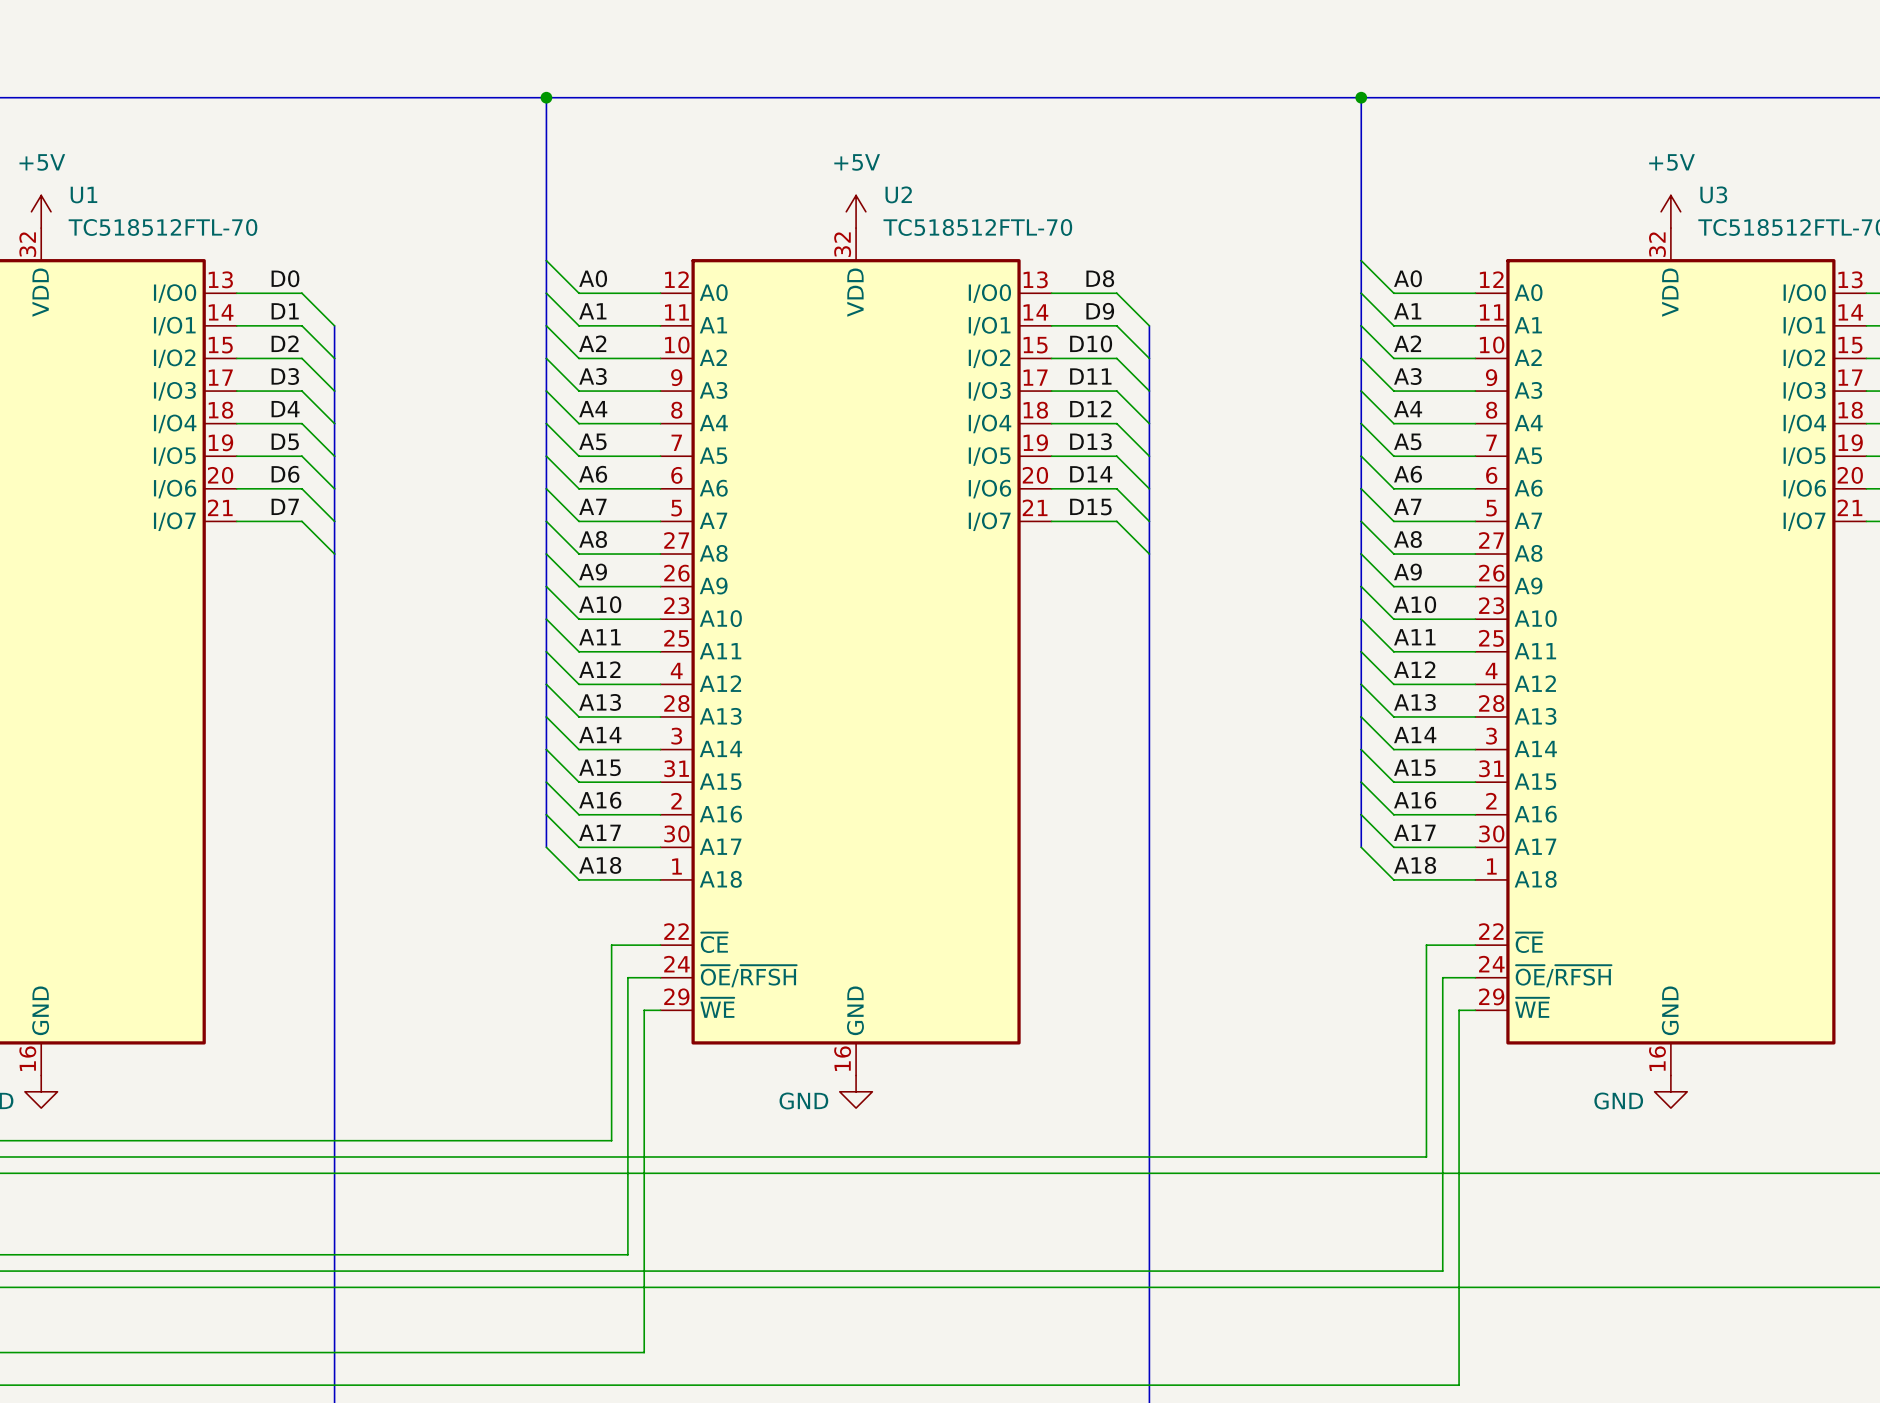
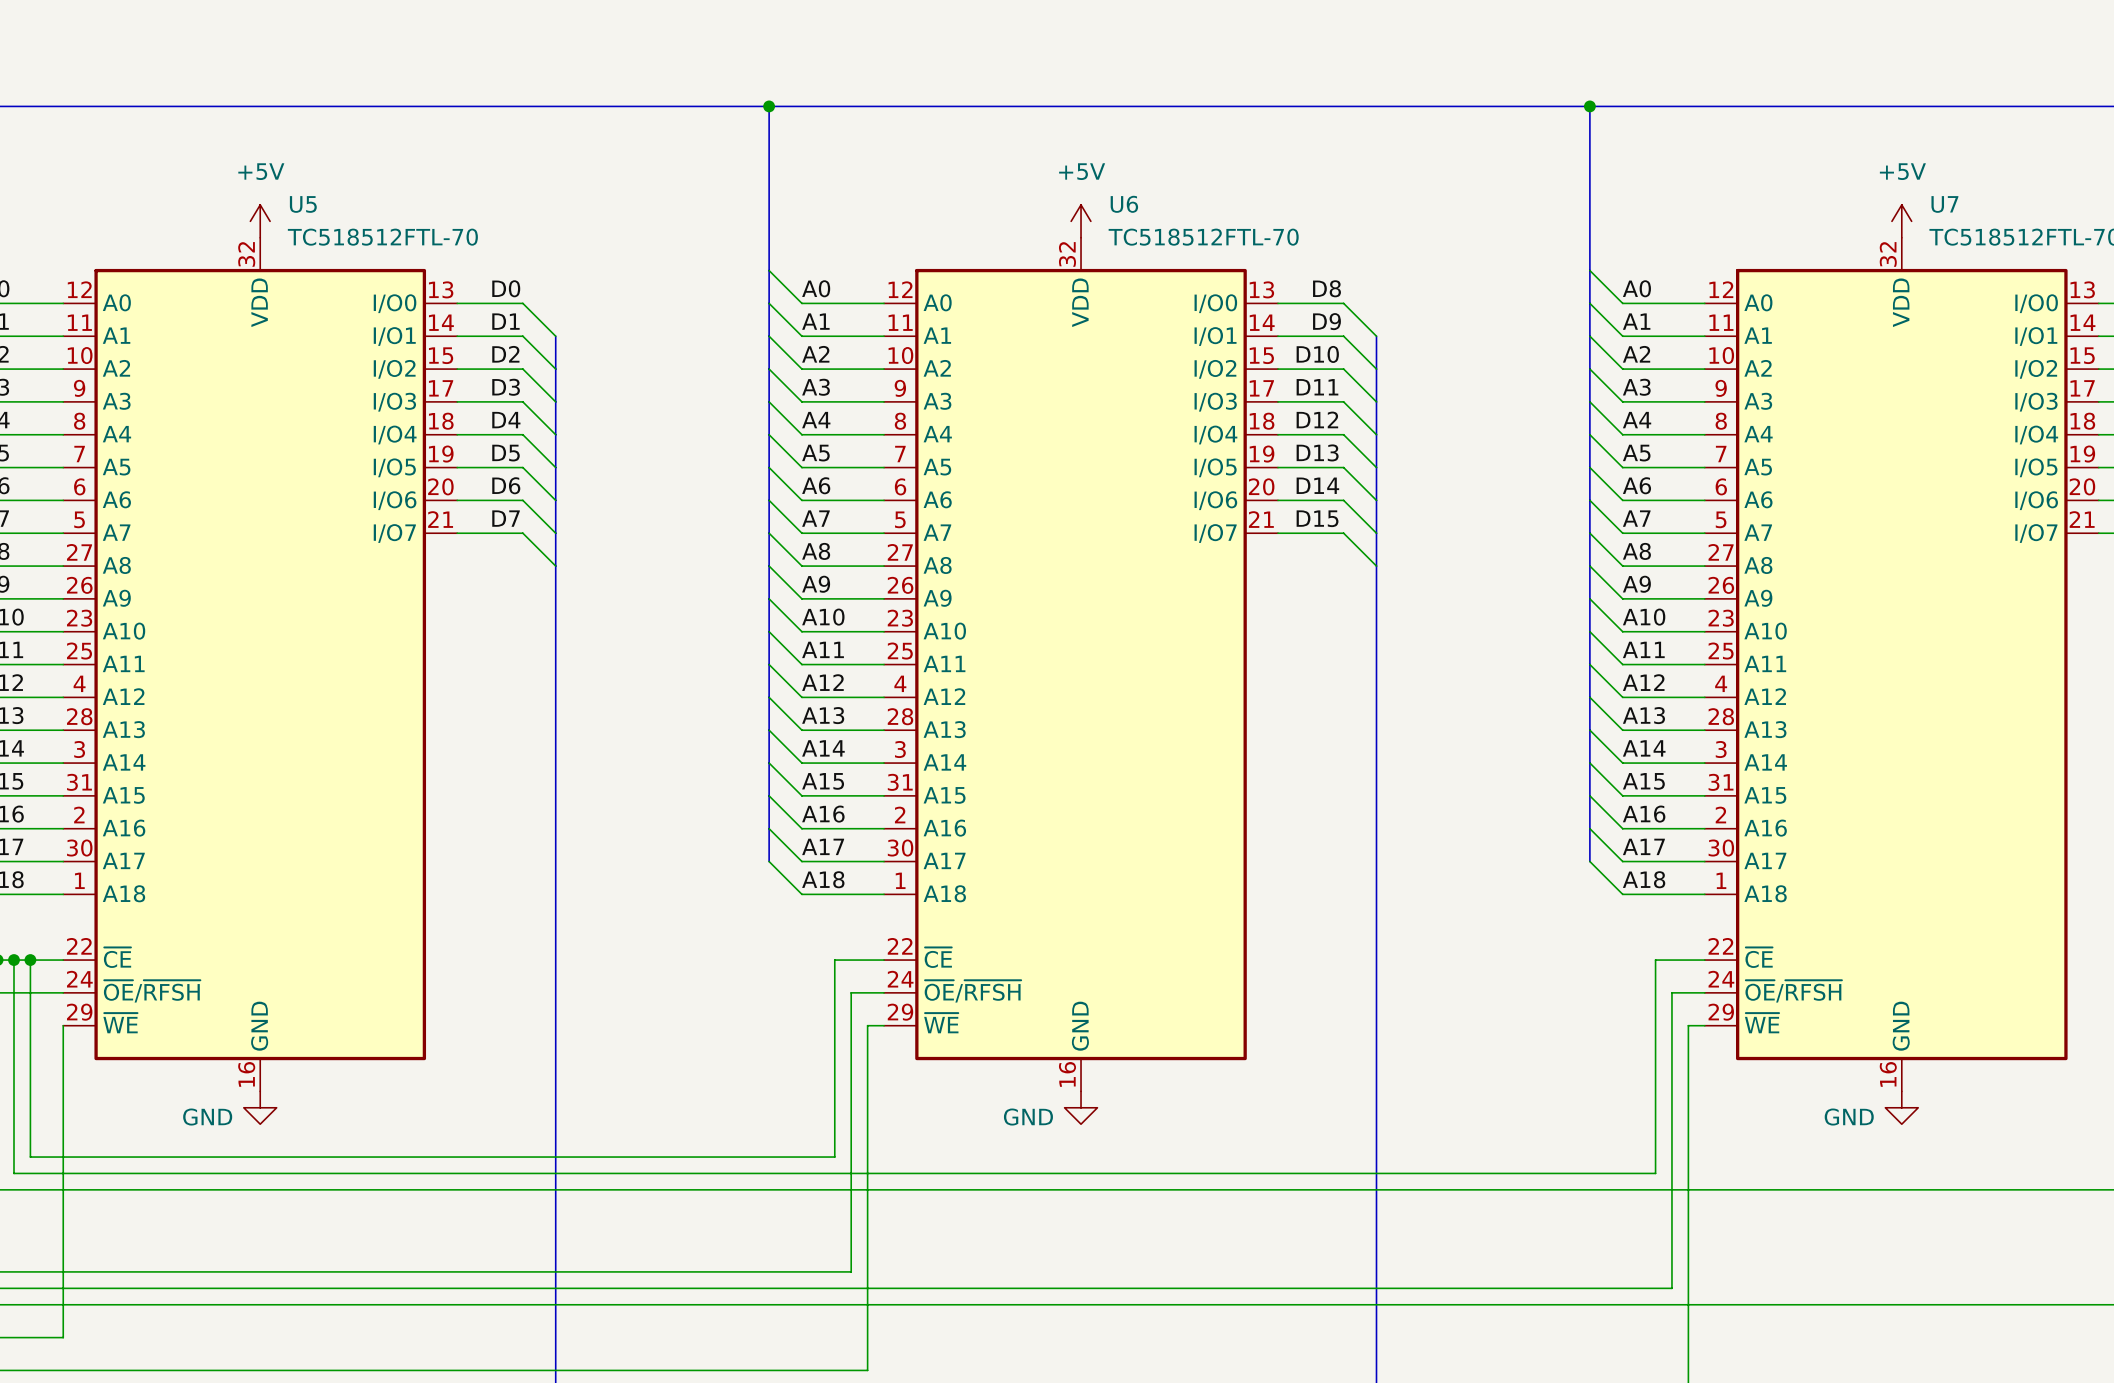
U2 name: U2 (898, 194) -> U6 (1124, 204)
U3 name: U3 (1713, 194) -> U7 (1944, 204)
U1 name: U1 (83, 195) -> U5 (303, 204)

